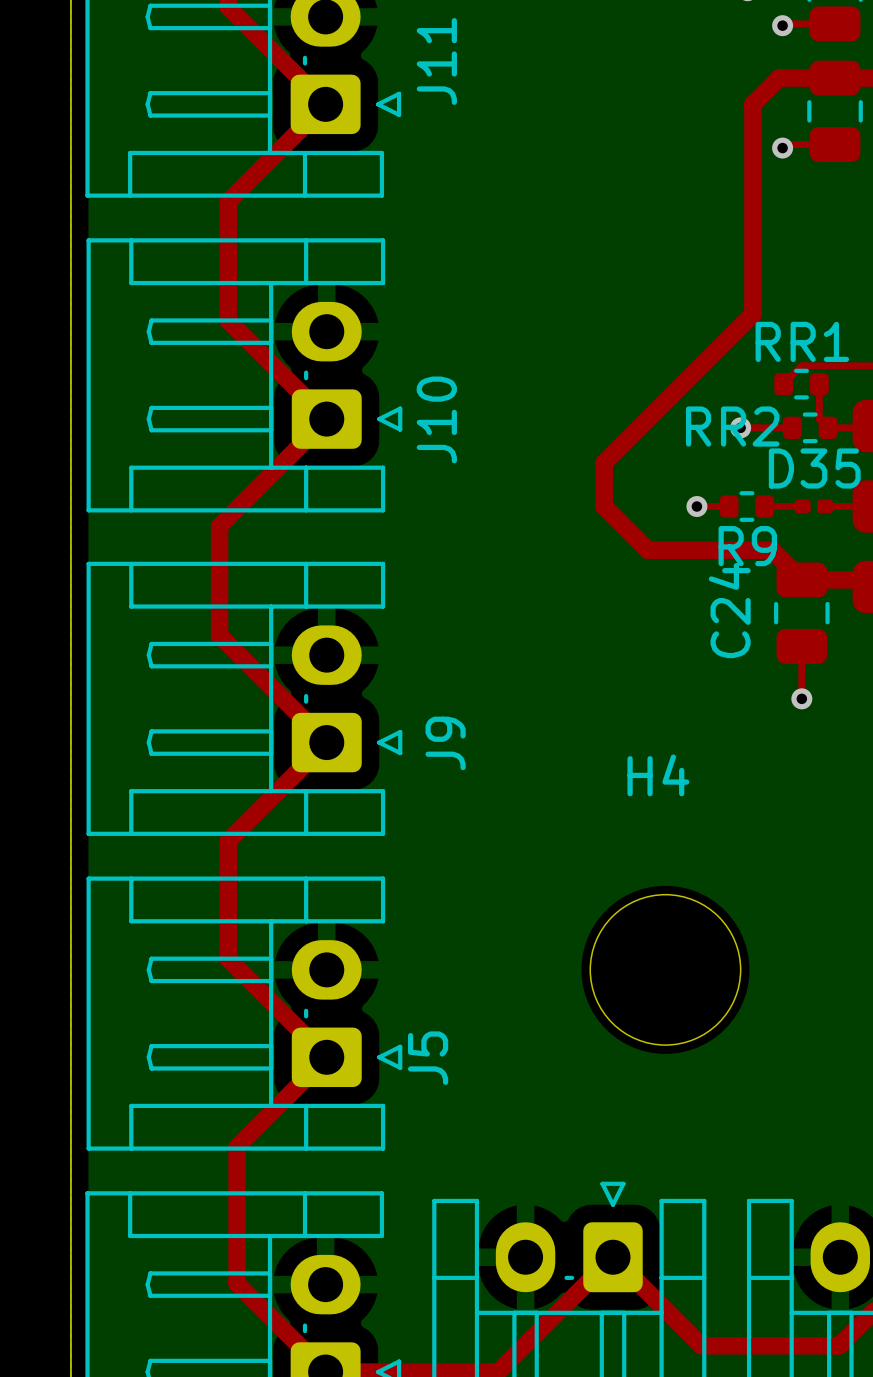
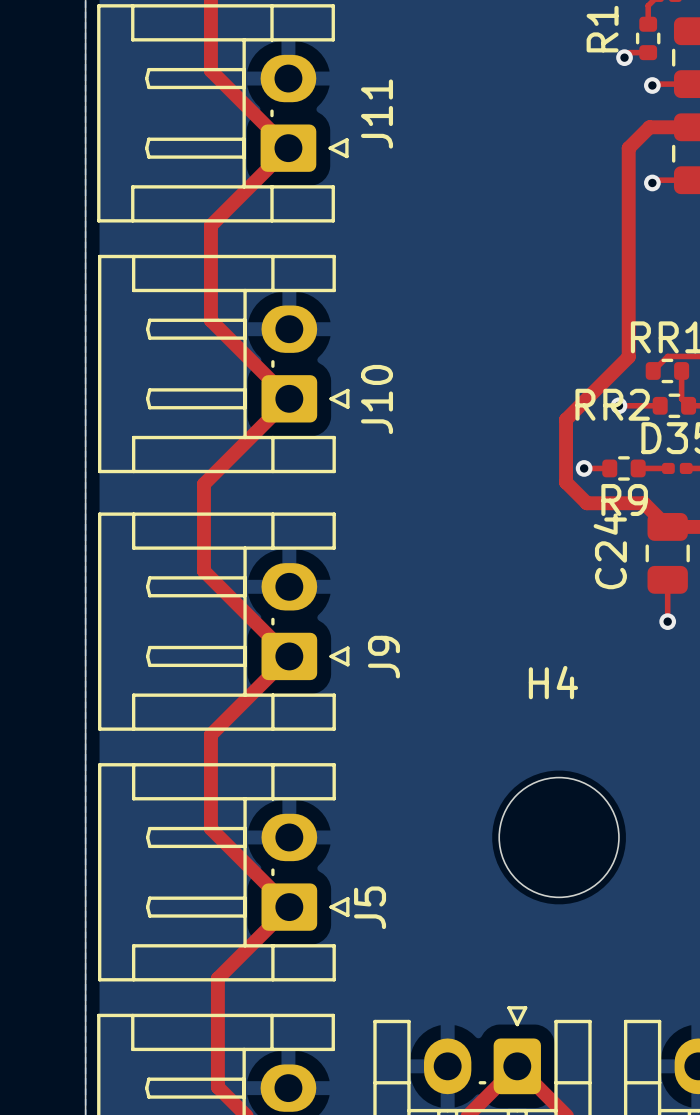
top track: (752, 314) (604, 462) (604, 506) (647, 550) (700, 550) -> (628, 315) (628, 357) (566, 419) (566, 482) (586, 503)

